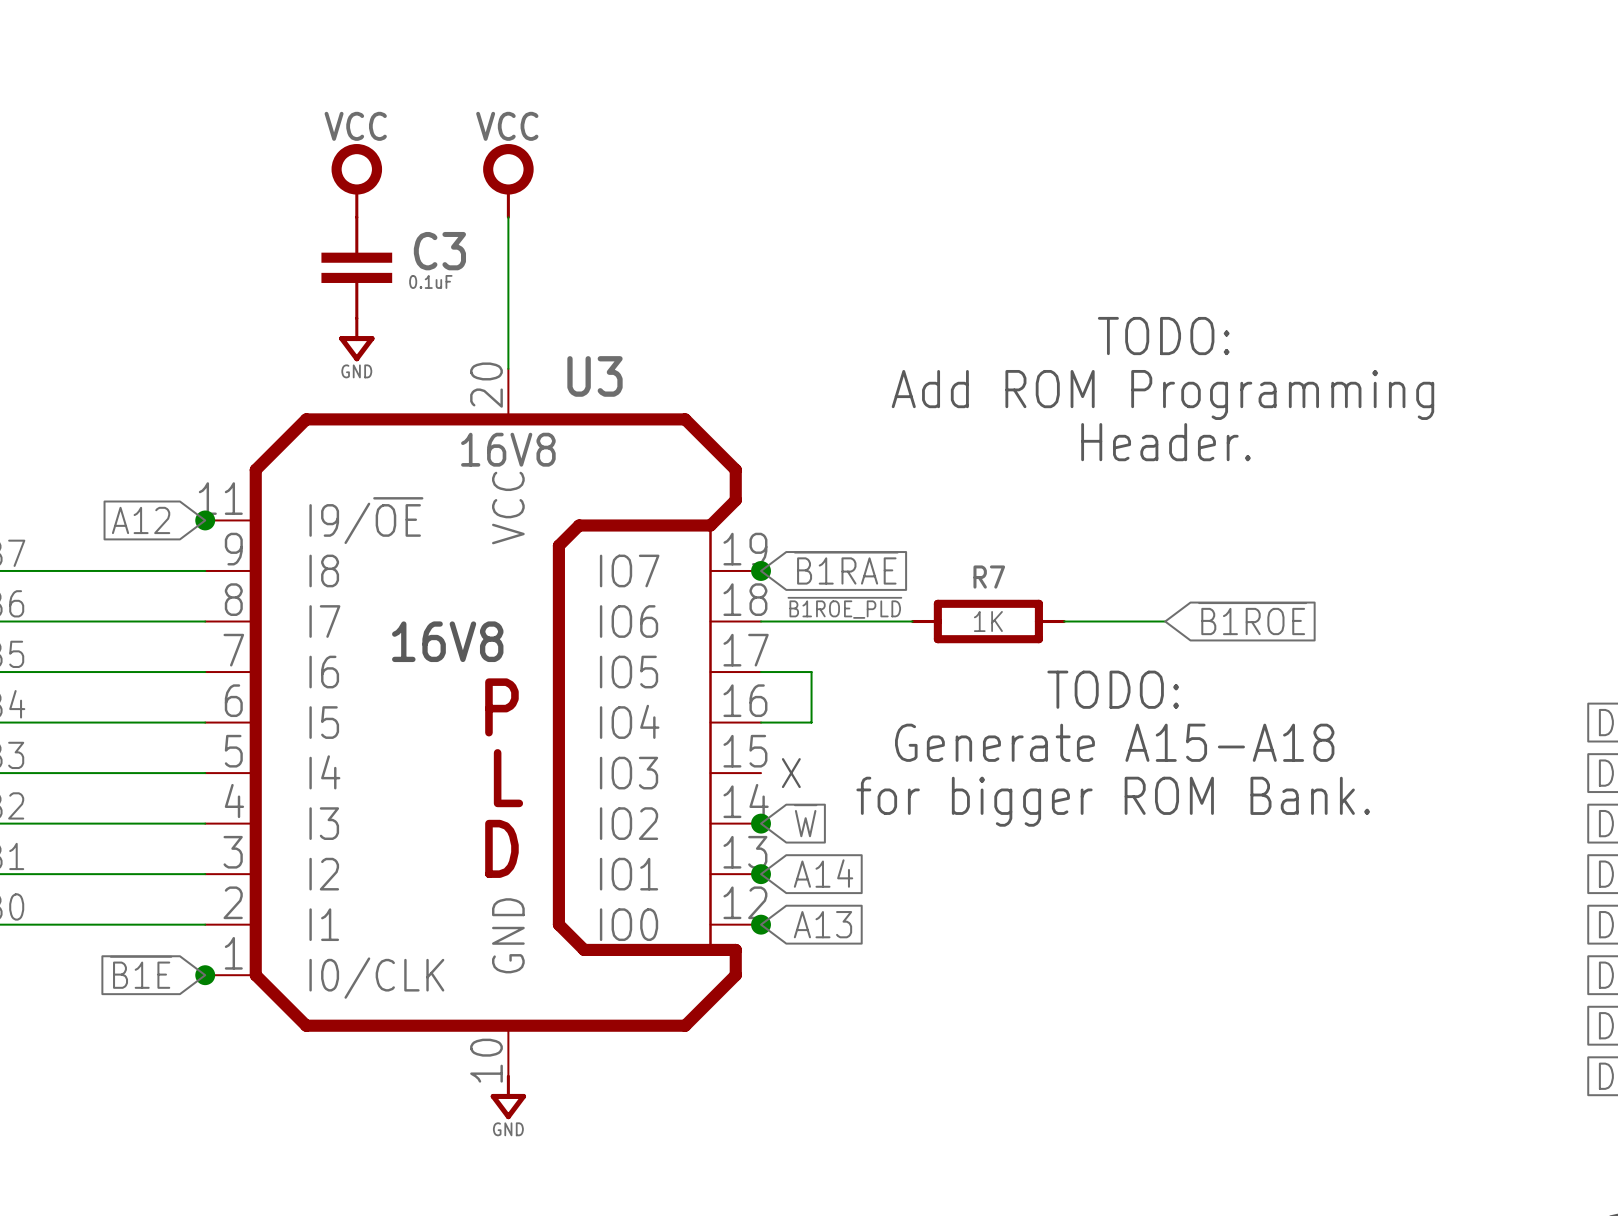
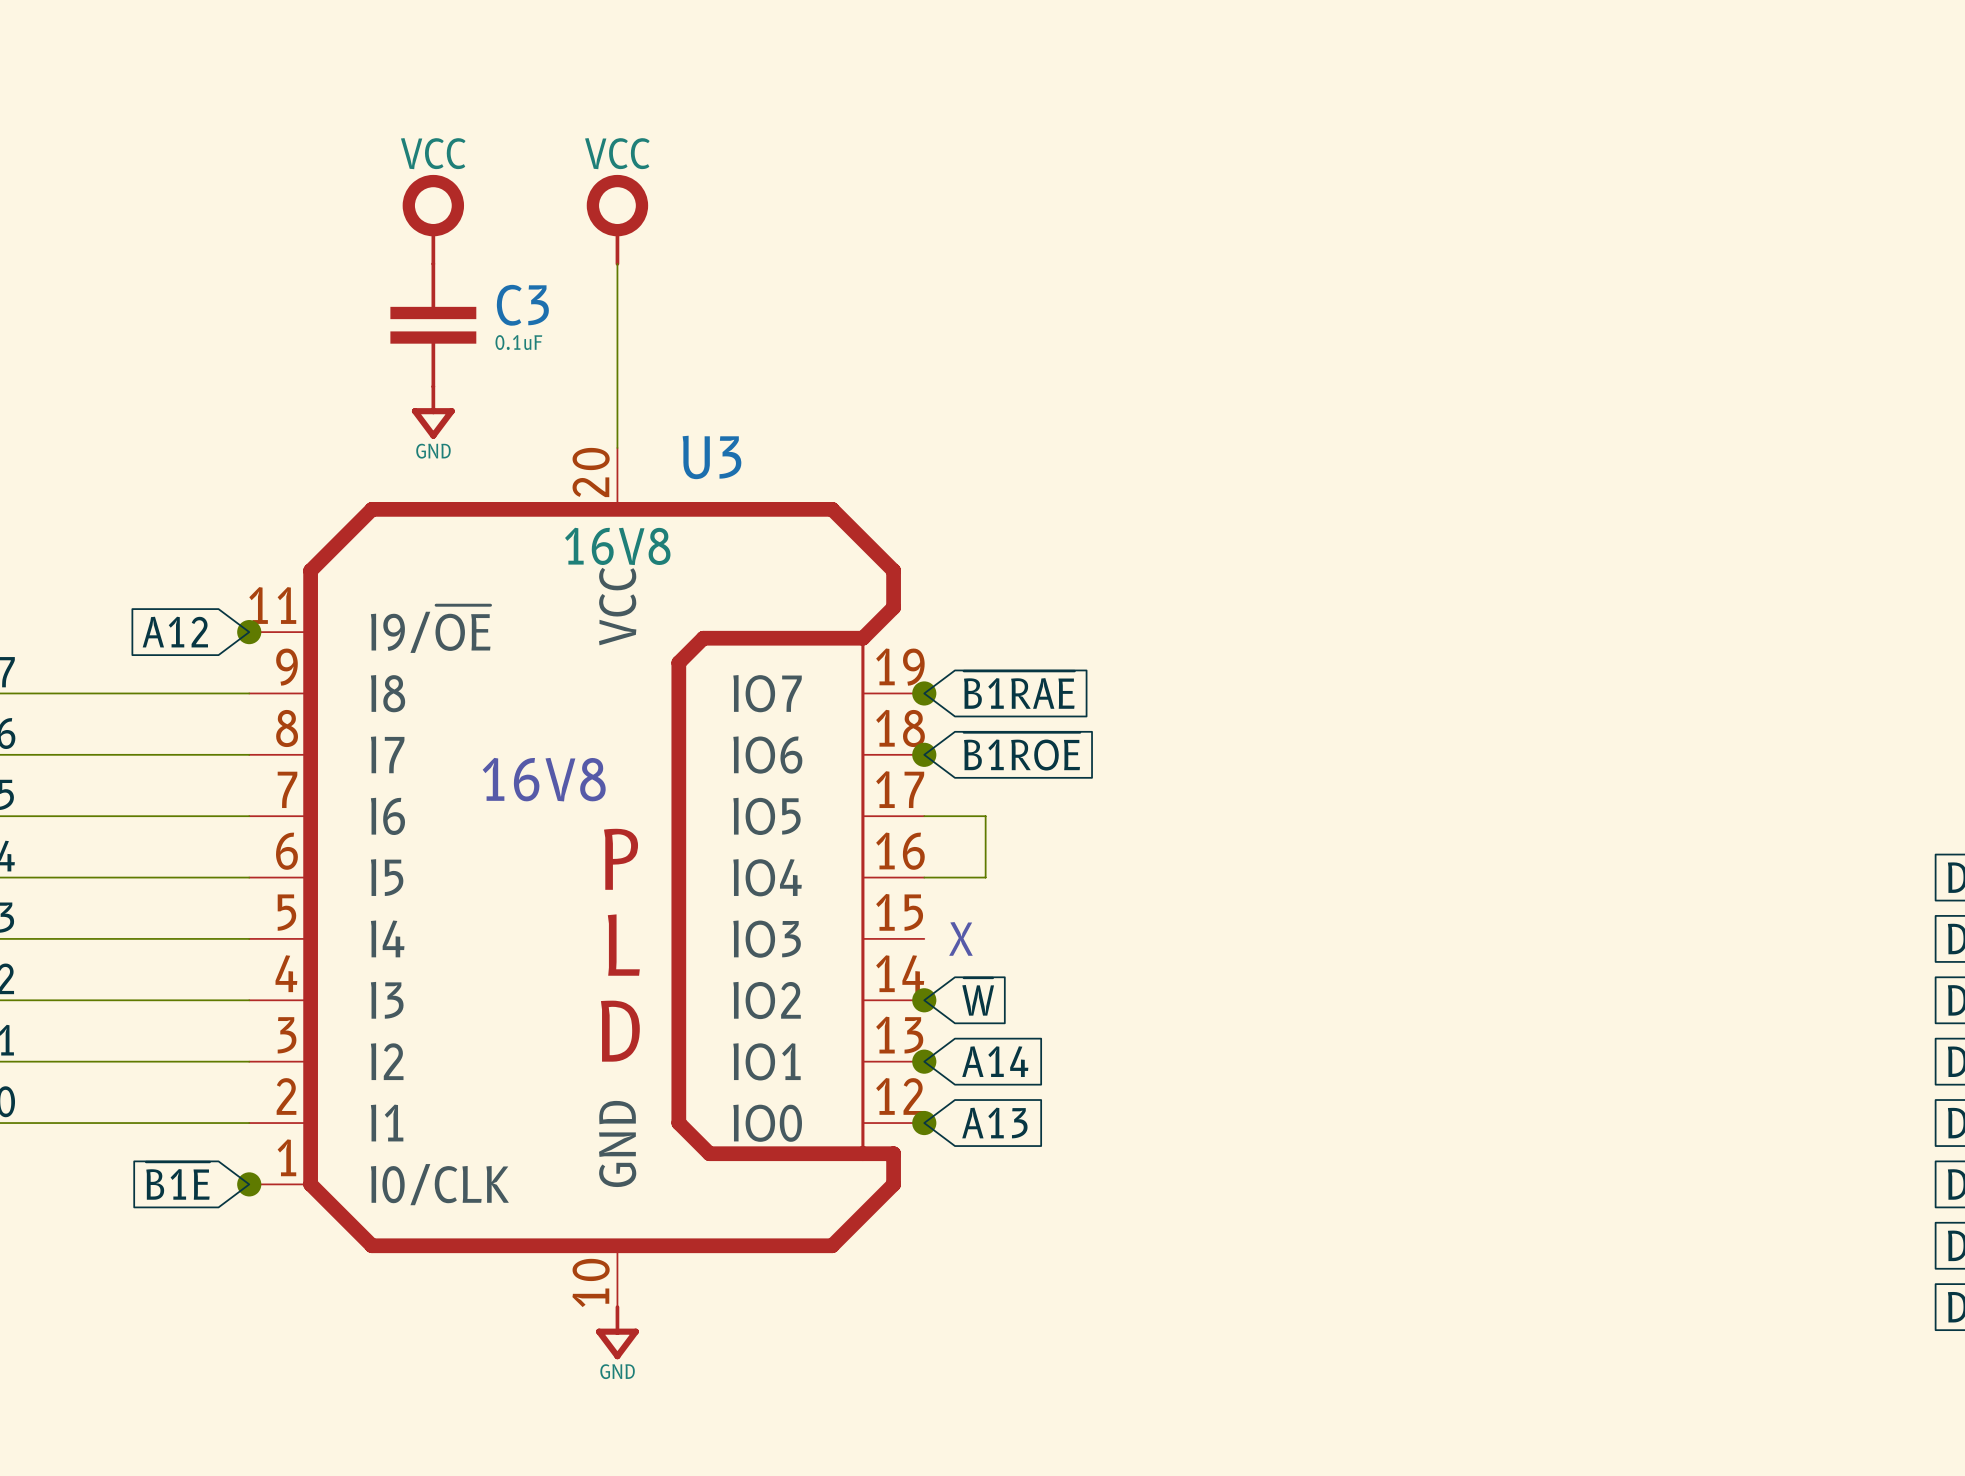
text: TODO: (1163, 336) -> none
text: Add ROM Programming (1162, 394) -> none
text: Header. (1165, 442) -> none
label: ~{B1ROE_PLD} (844, 607) -> none
global label position: ~{B1ROE} (1252, 618) -> ~{B1ROE} (1021, 751)
wire: (761, 621) (912, 621) -> none
junction: none -> (924, 754)
R7: 1K (988, 621) -> none
wire: (1064, 621) (1165, 621) -> none
text: TODO: (1113, 689) -> none
text: Generate A15-A18 (1114, 742) -> none
text: for bigger ROM Bank. (1113, 801) -> none

